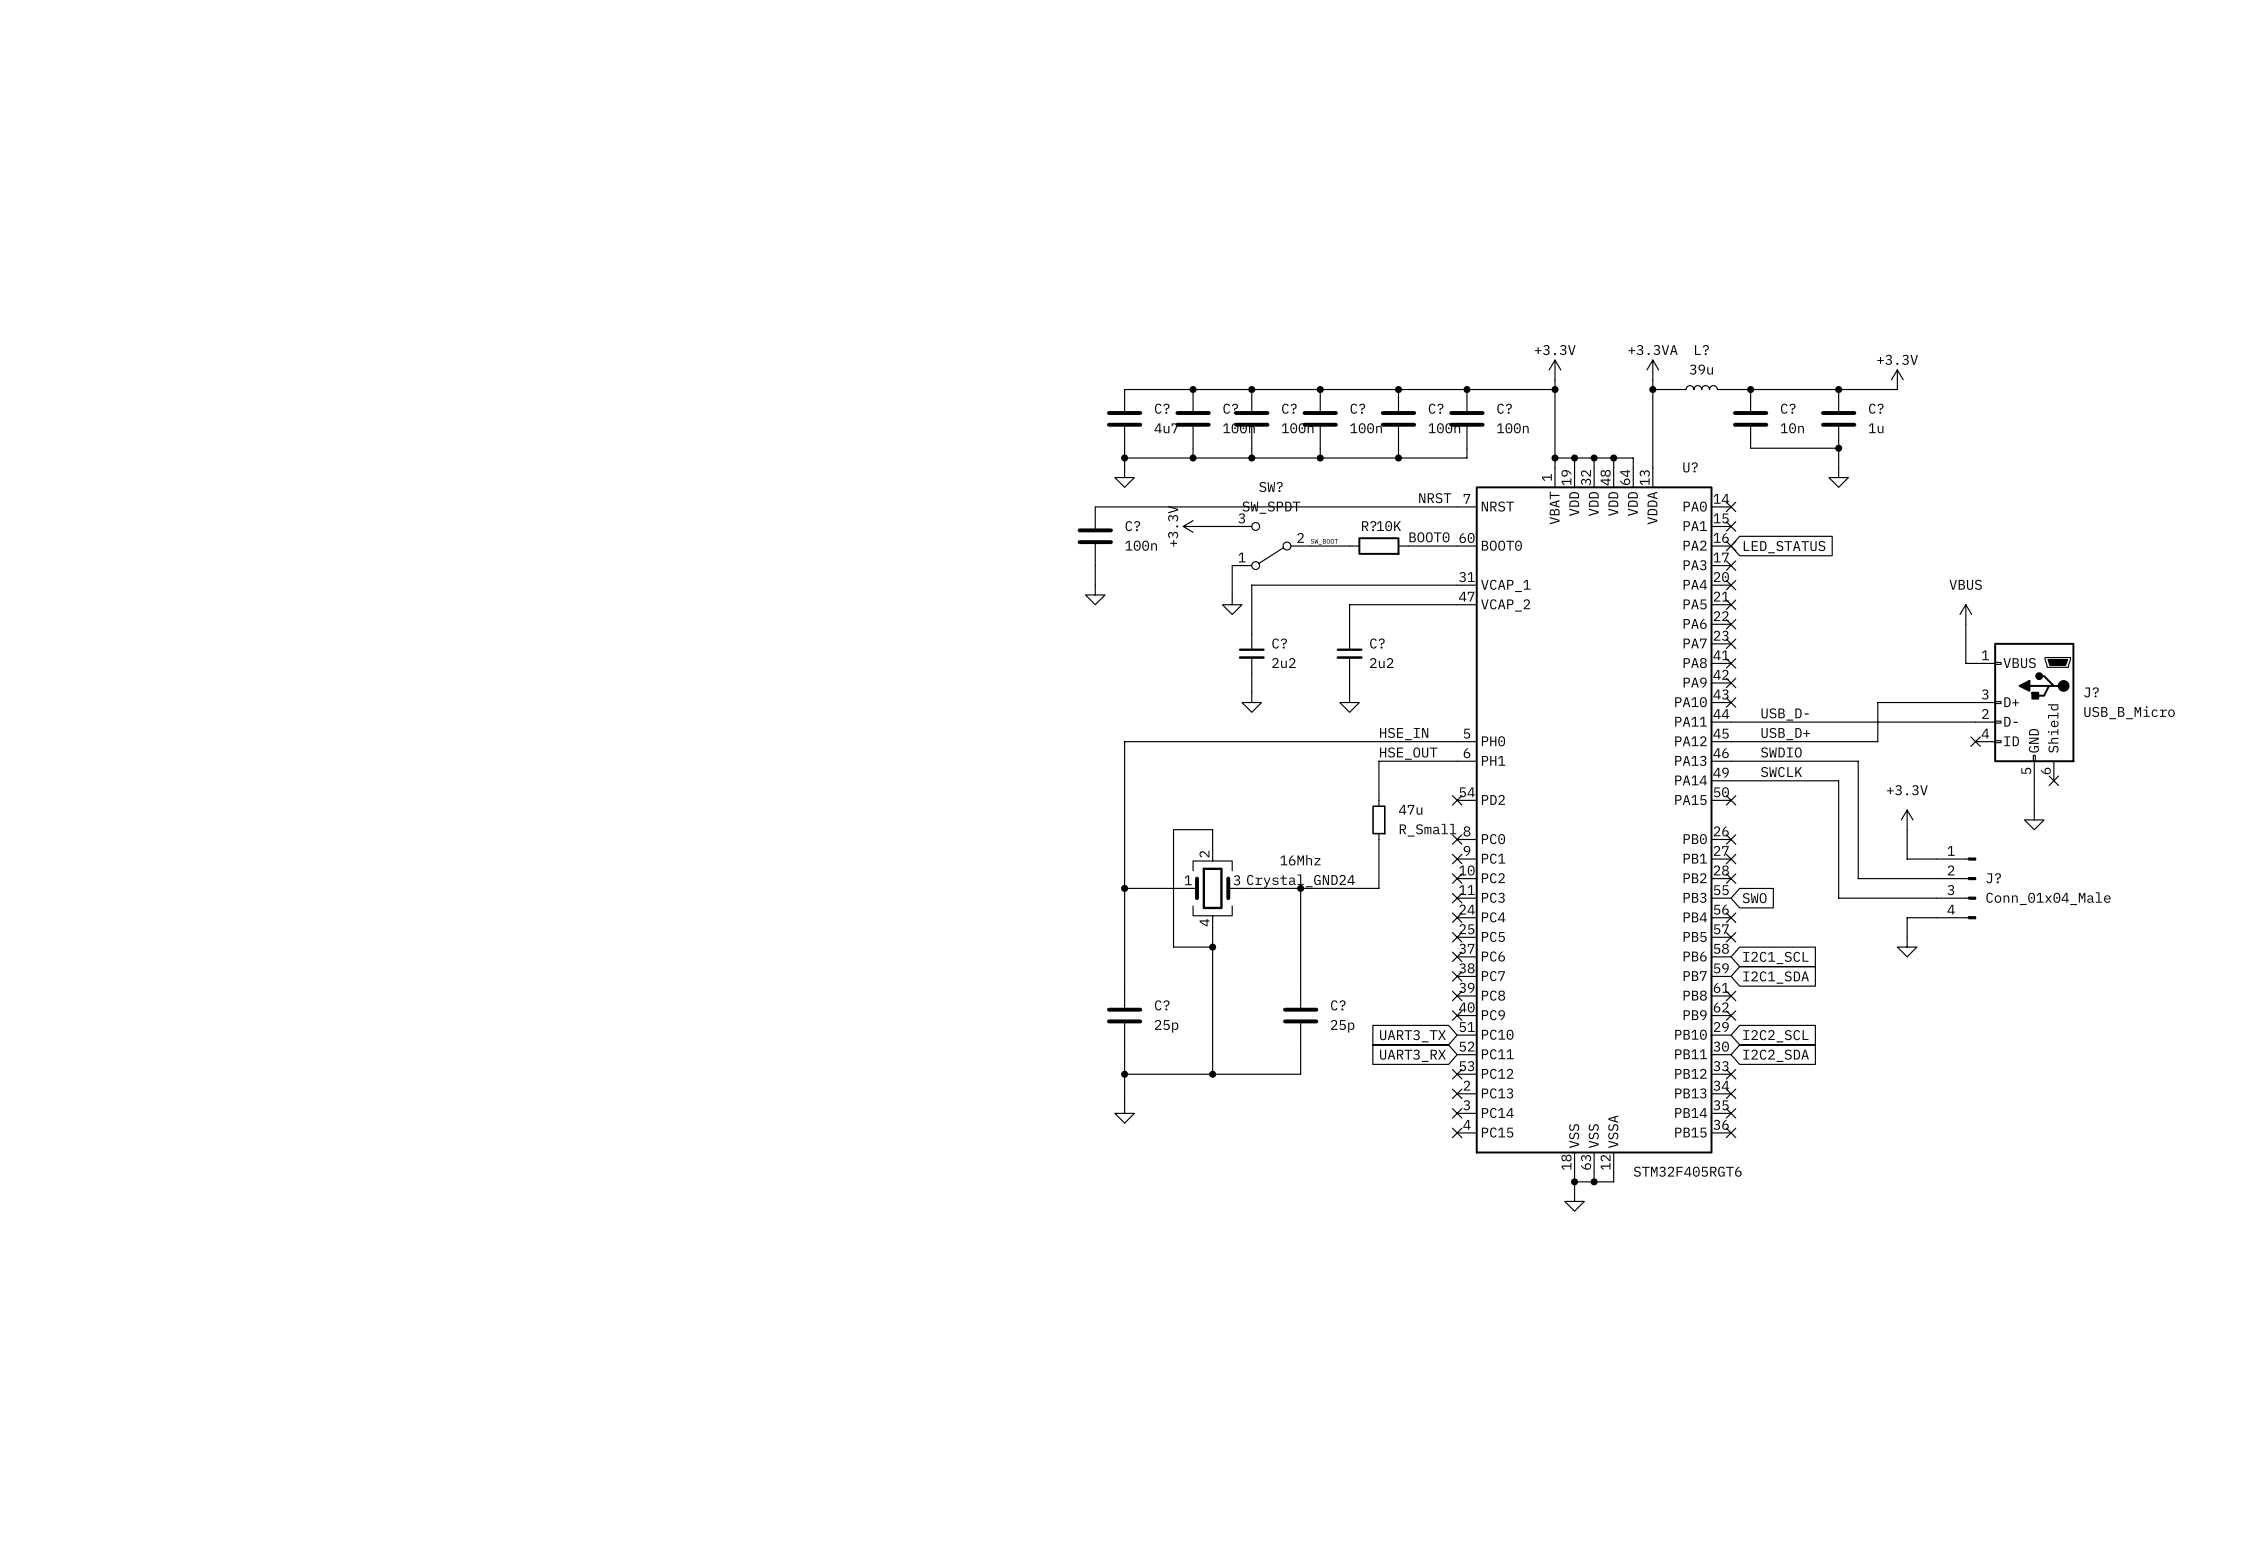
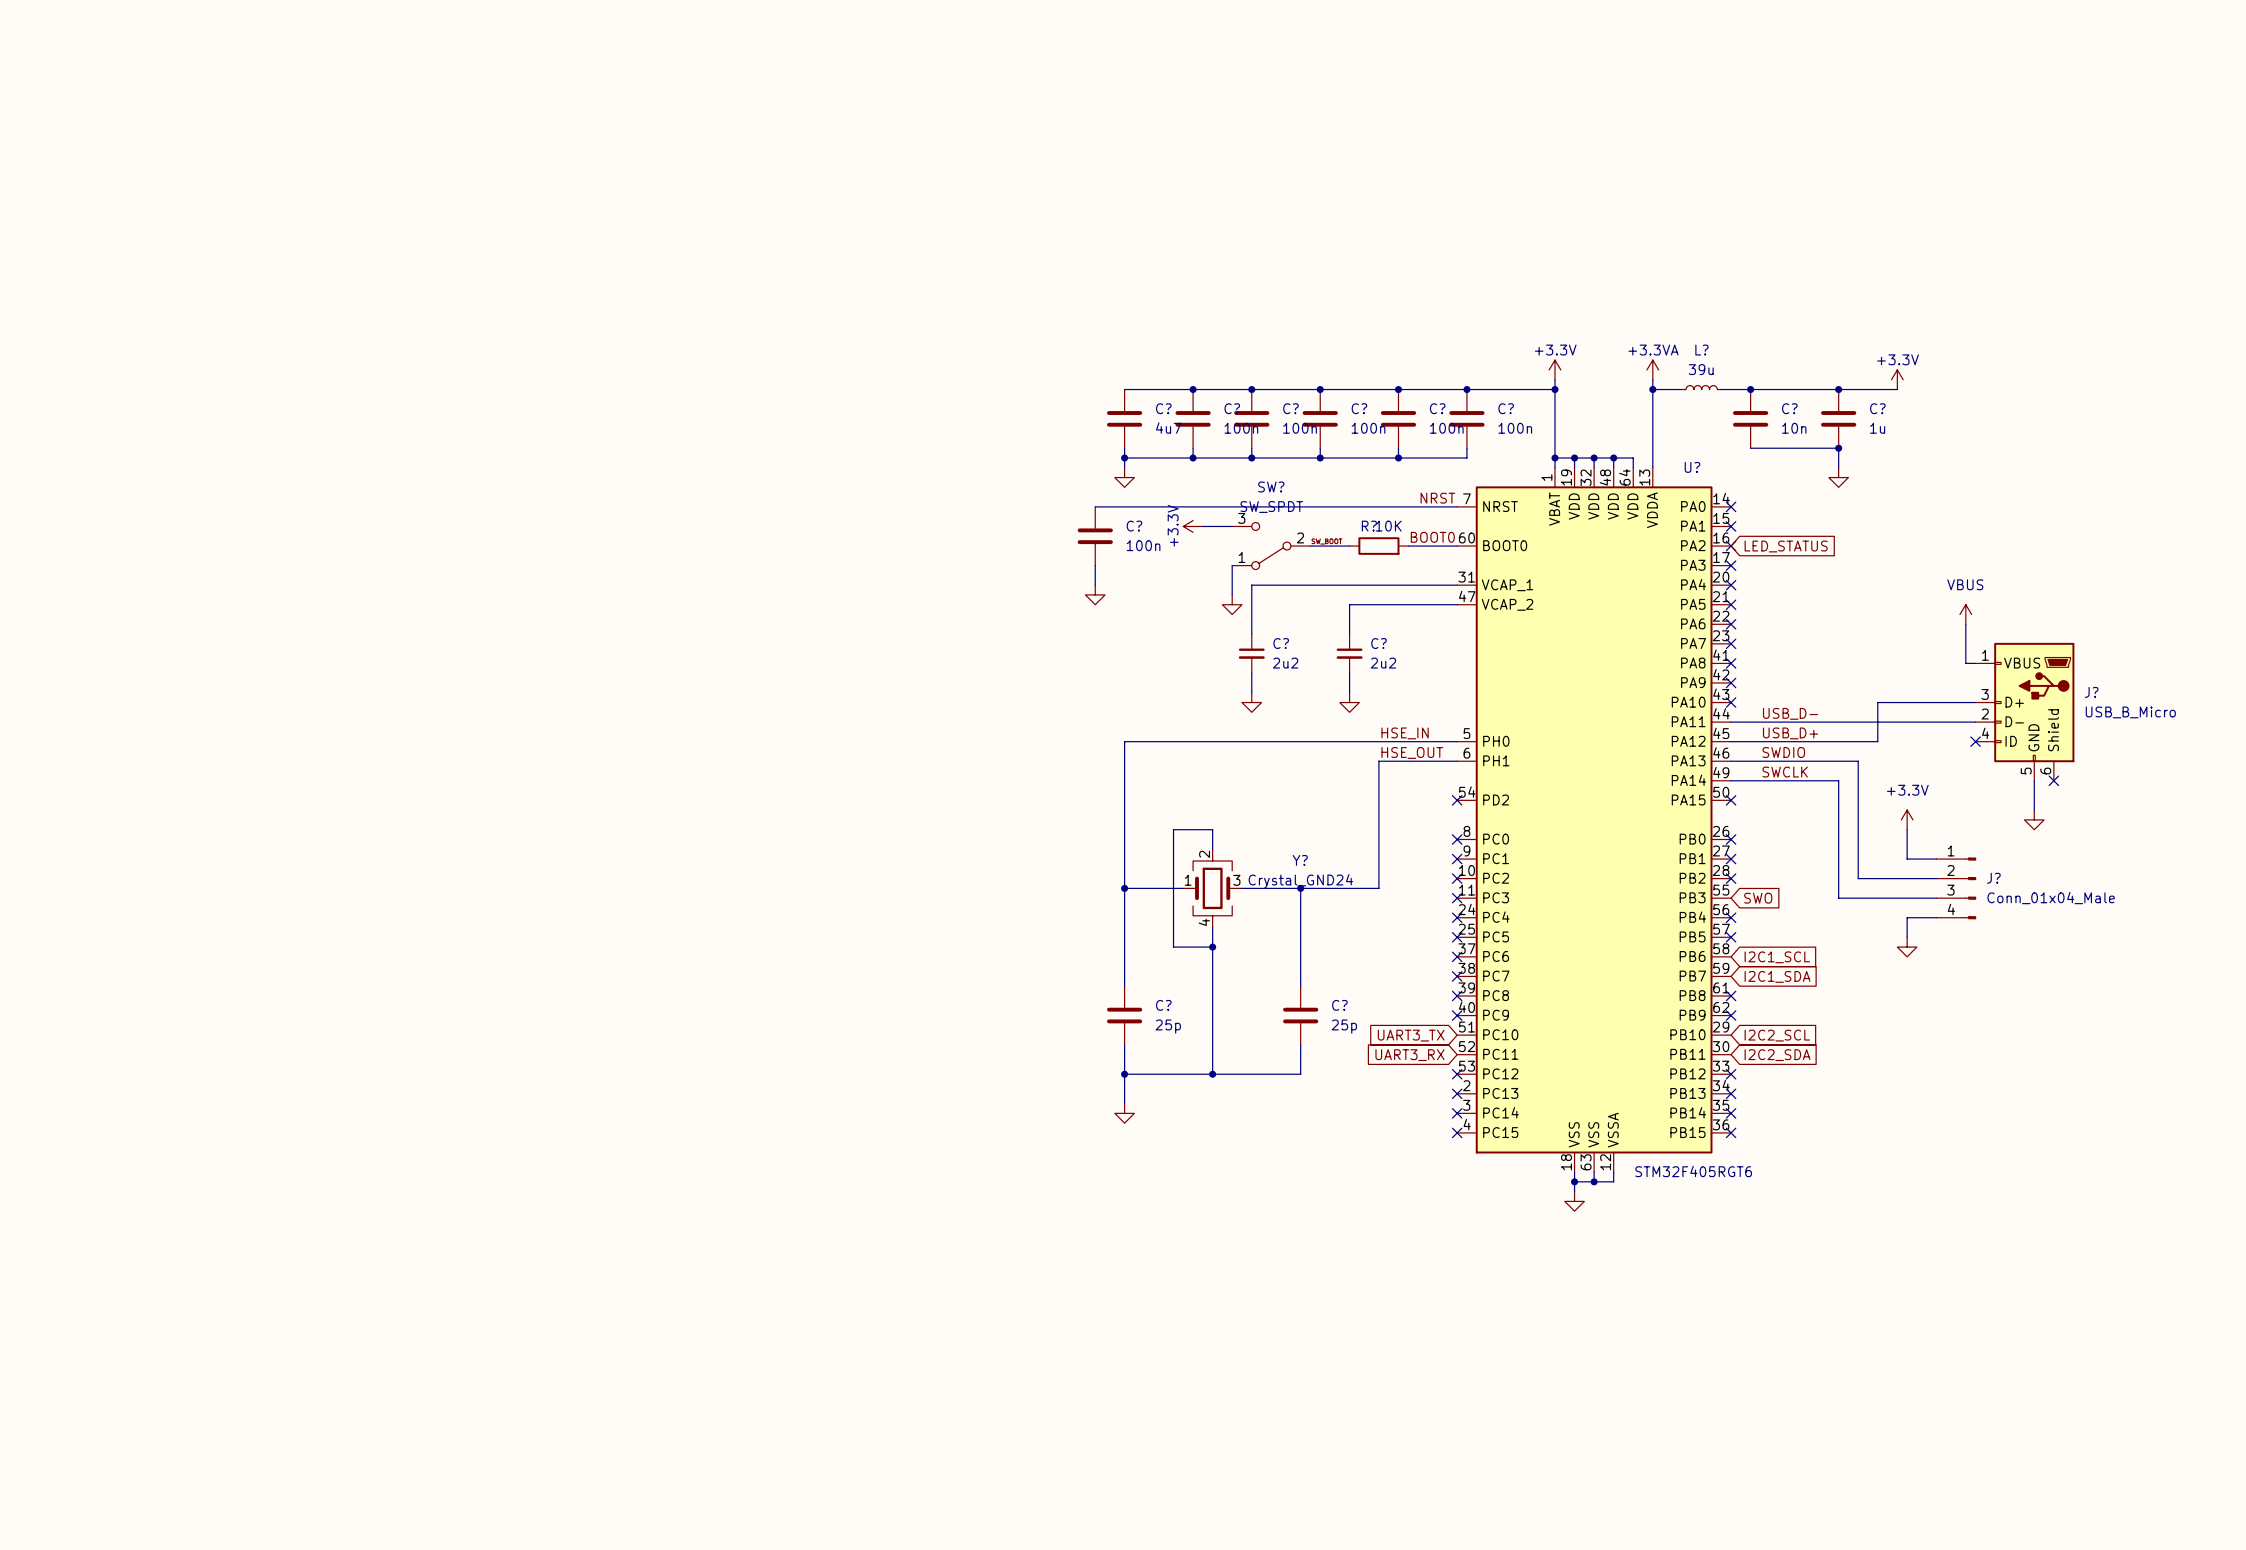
wire: none -> (1378, 800) (1378, 839)
47u: R_Small (1378, 819) -> none
16Mhz name: 16Mhz (1300, 860) -> Y? (1300, 860)

